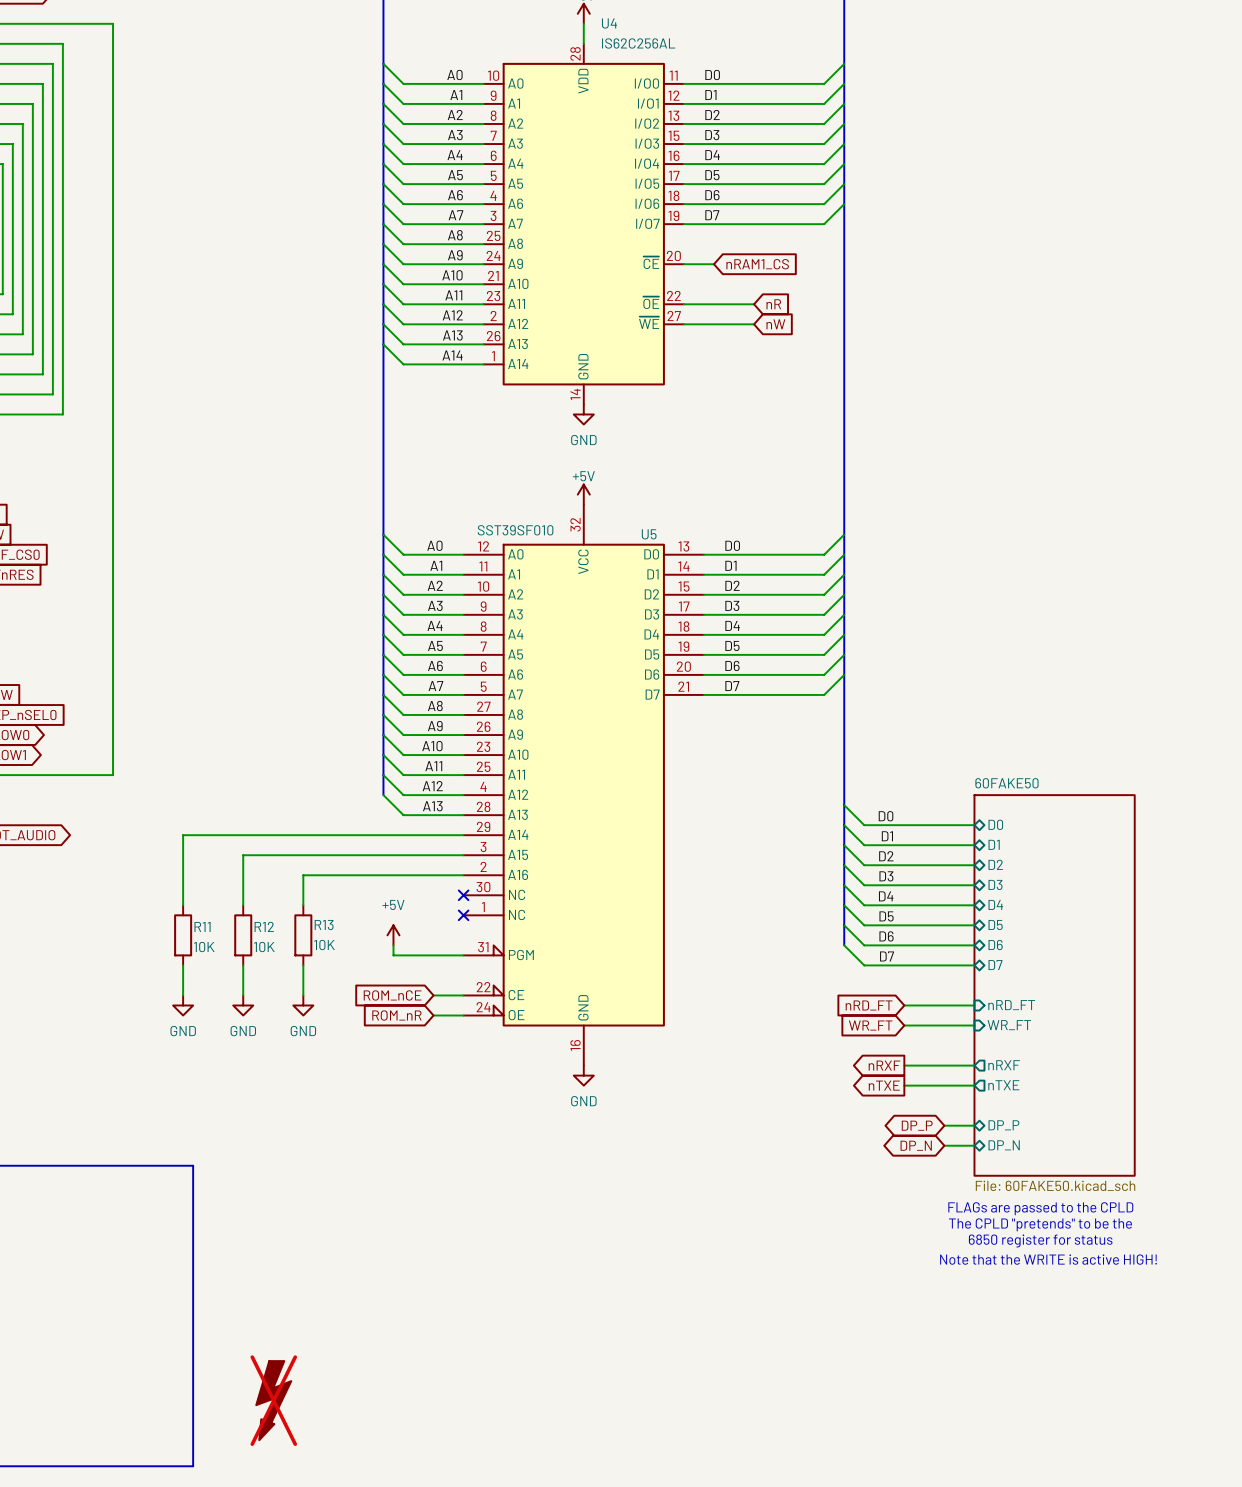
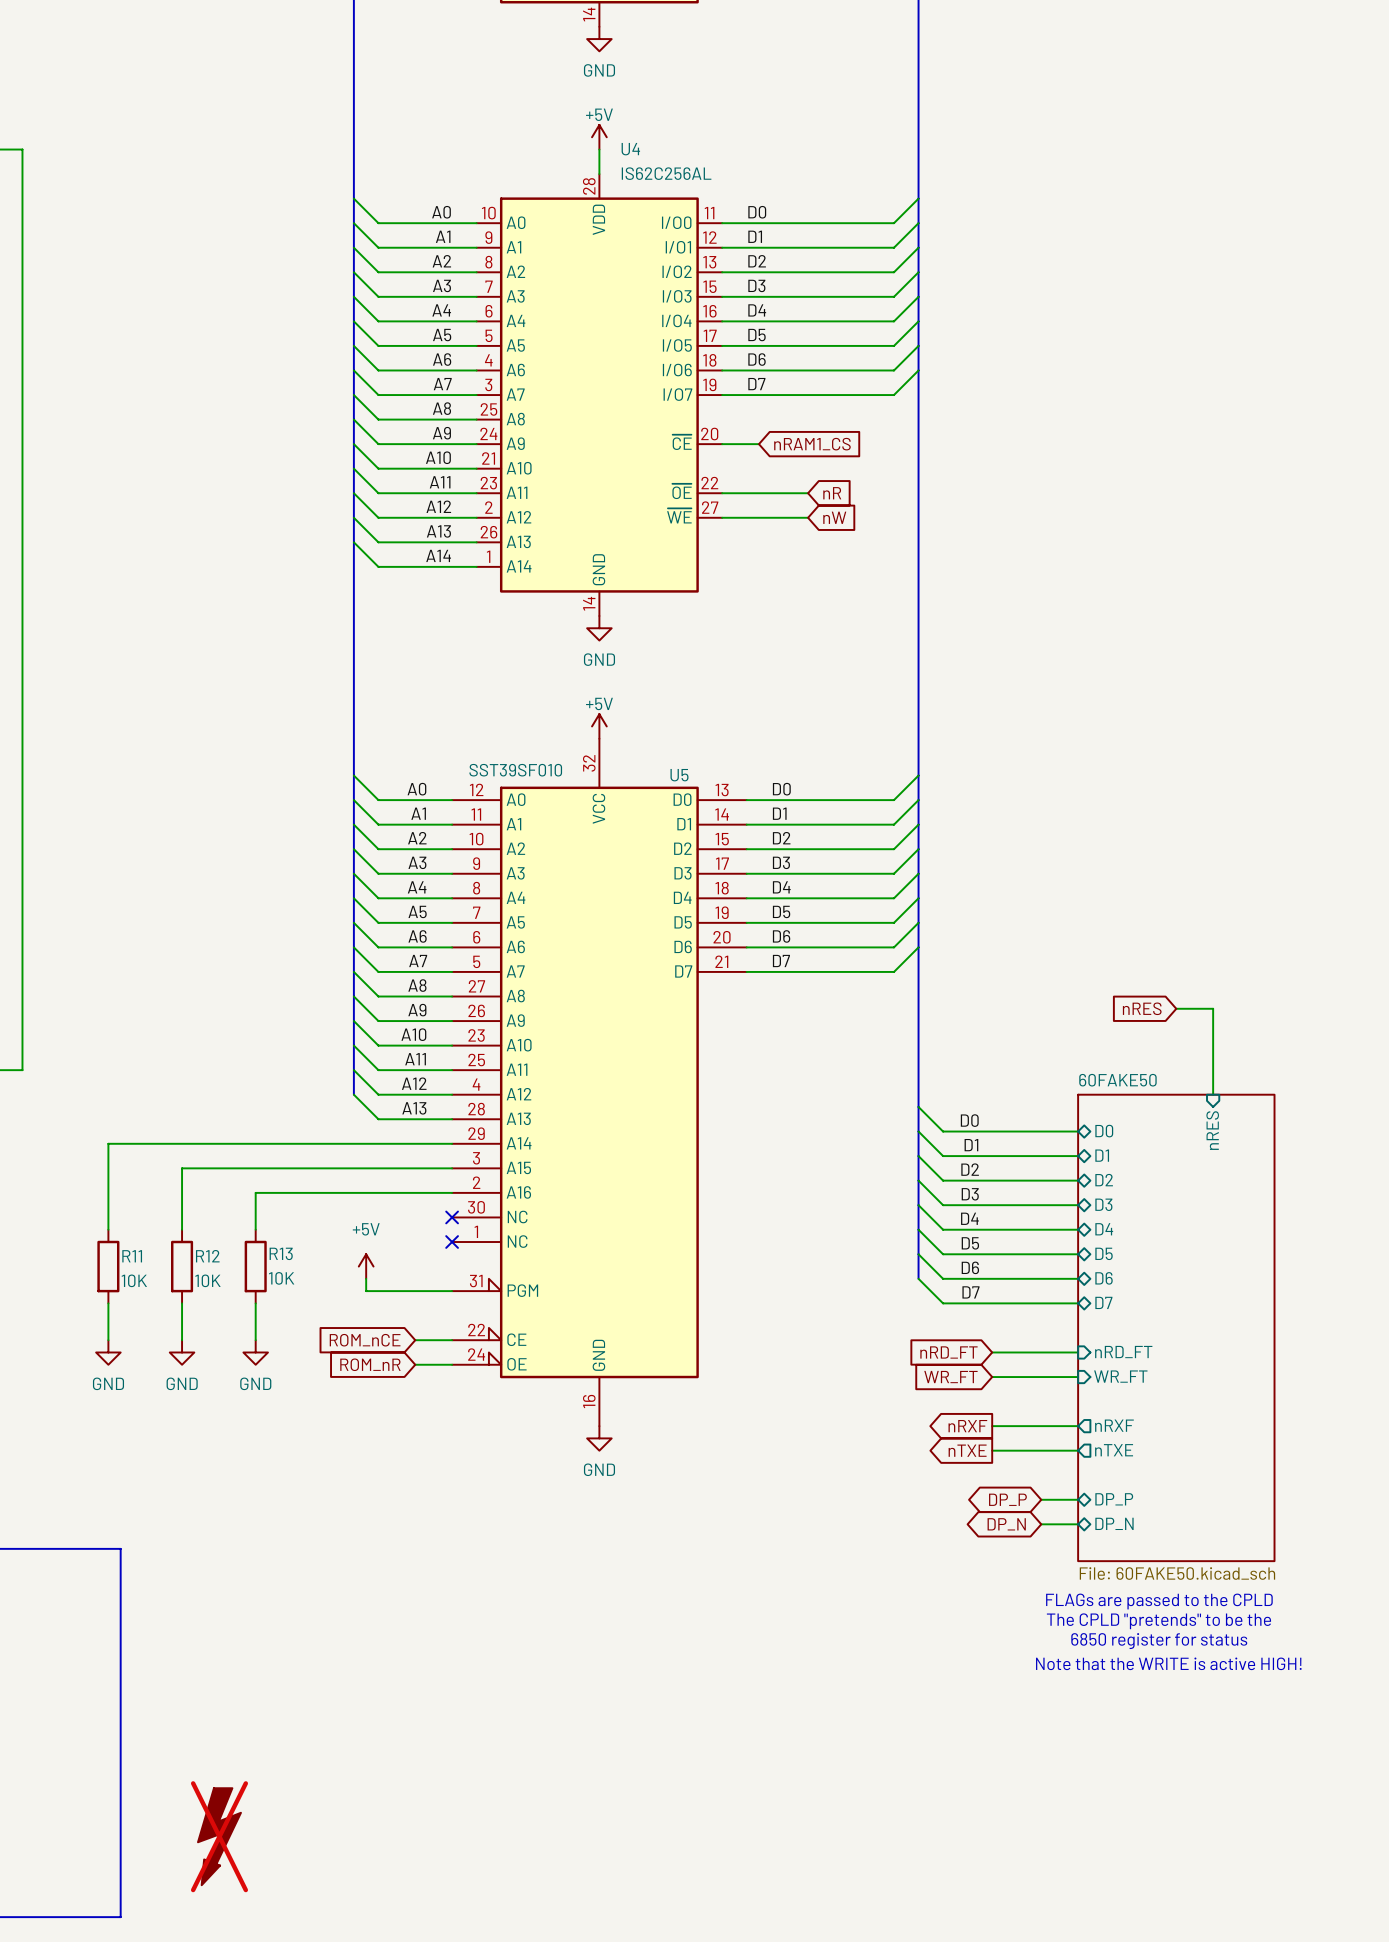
global label: none -> nRES (1142, 1008)
wire: none -> (1176, 1008) (1213, 1008) (1213, 1094)
sheet pin: none -> nRES (1212, 1130)

